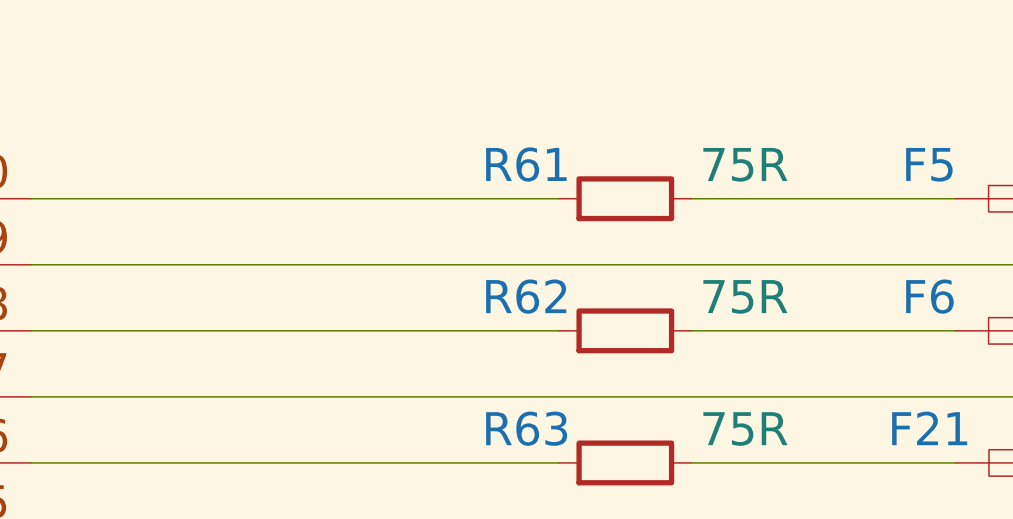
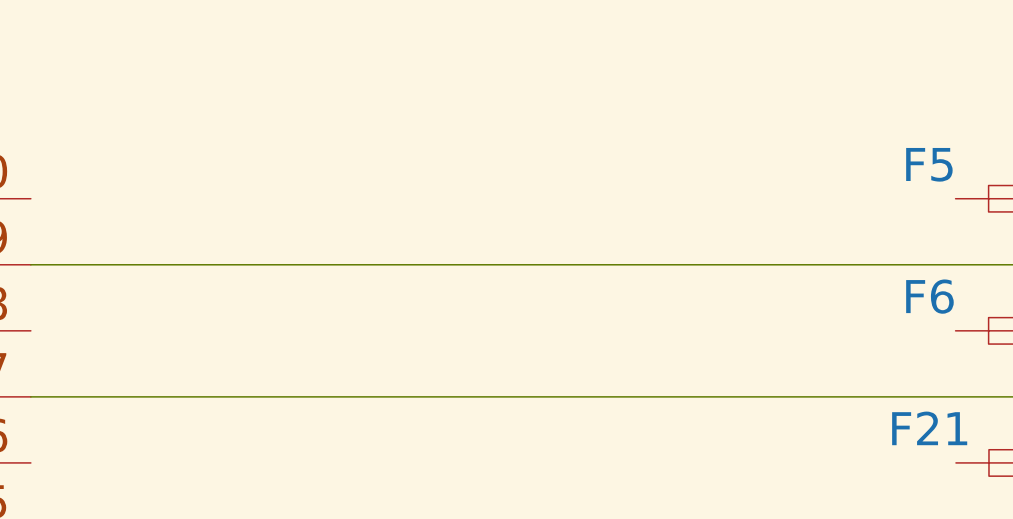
wire: (30, 198) (559, 198) -> none
R61: 75R (625, 198) -> none
wire: (691, 198) (955, 198) -> none
wire: (30, 330) (559, 330) -> none
R62: 75R (625, 330) -> none
wire: (691, 330) (955, 330) -> none
wire: (30, 462) (559, 462) -> none
R63: 75R (625, 462) -> none
wire: (691, 462) (955, 462) -> none

